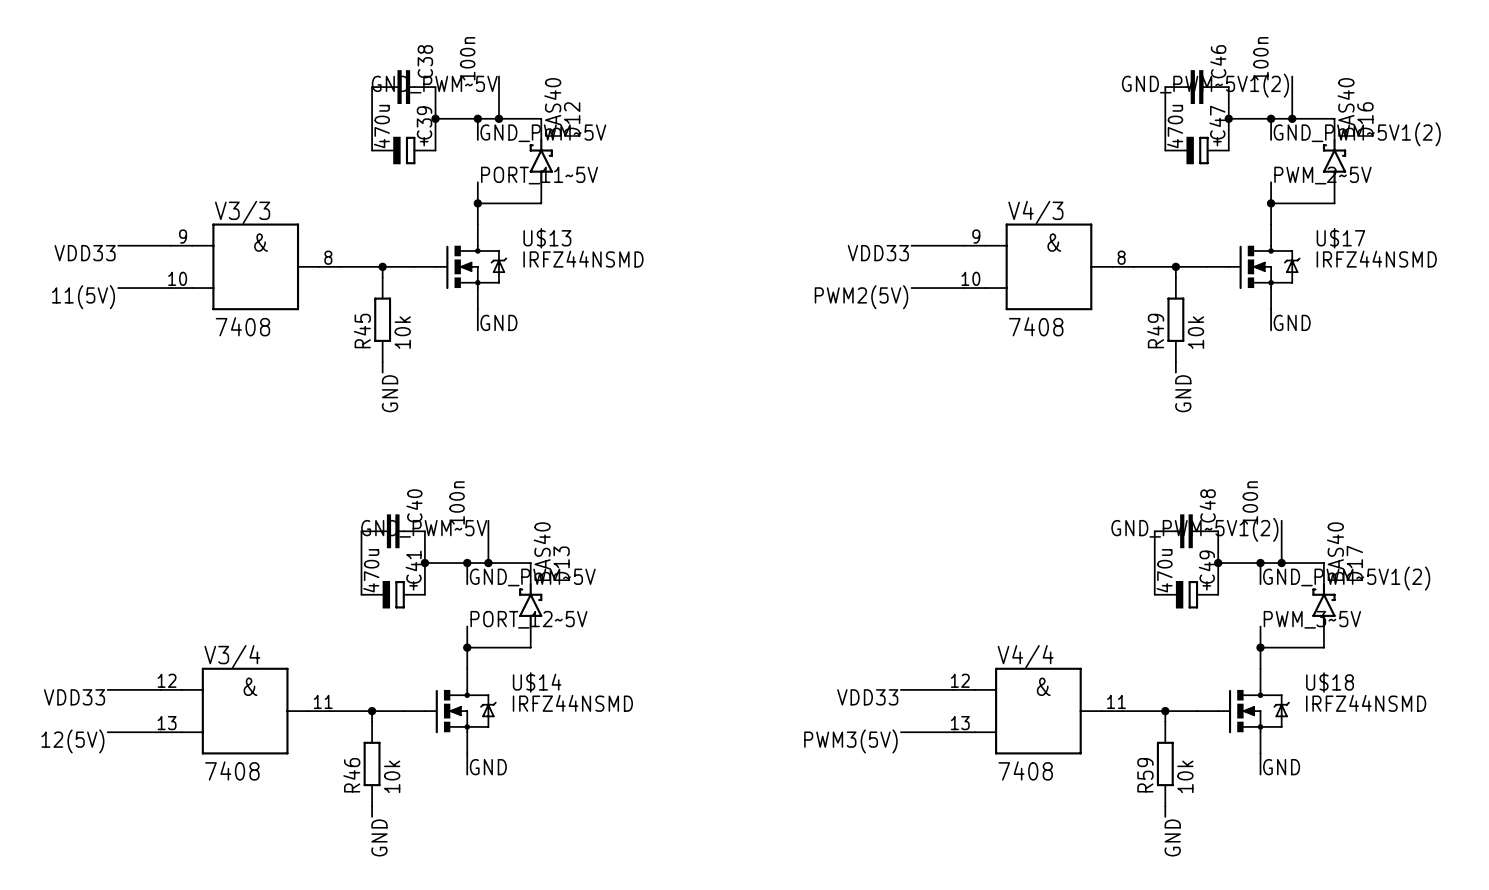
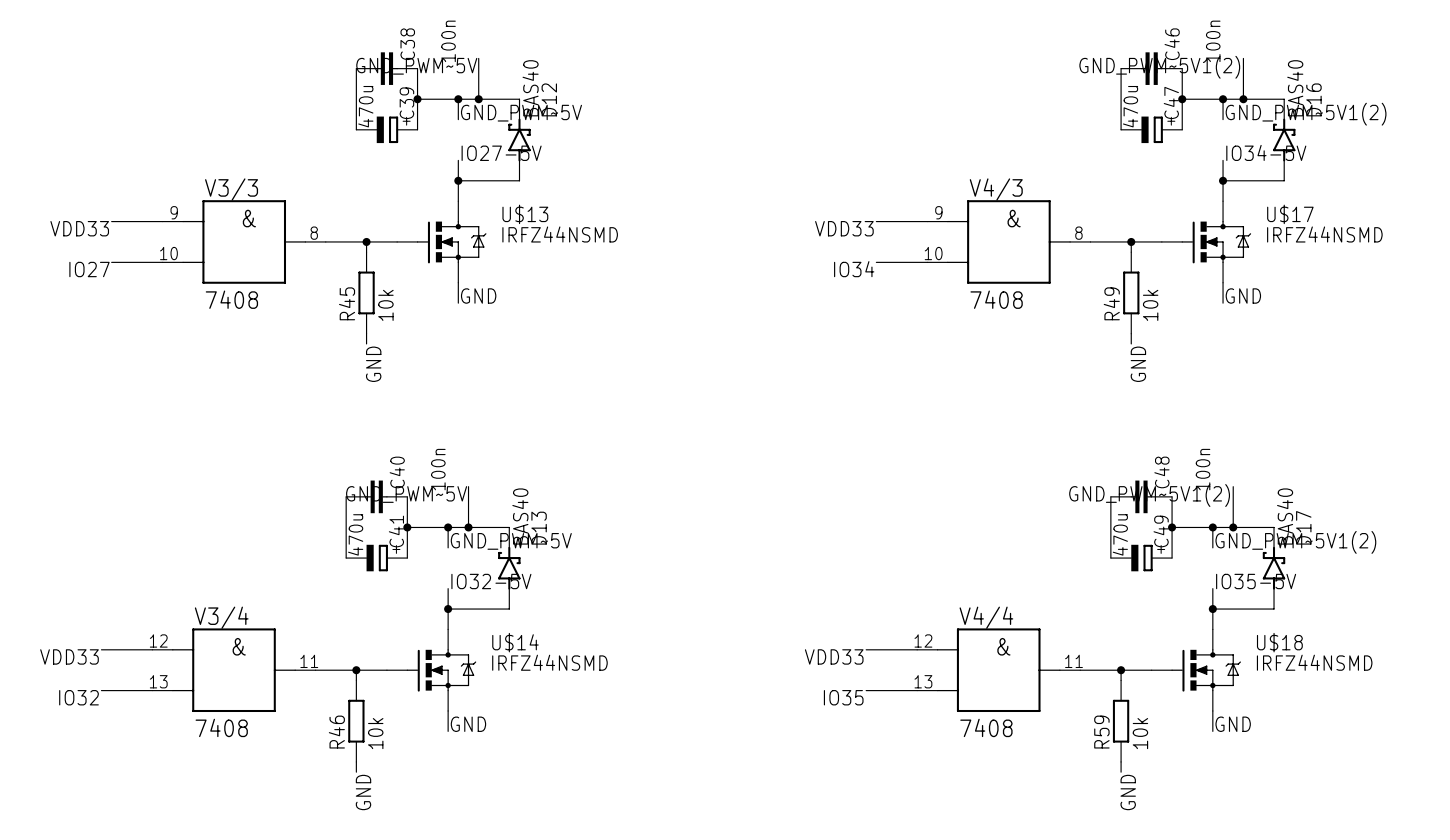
label: PORT_11~5V (539, 175) -> IO27-5V (501, 153)
label: PWM_2~5V (1322, 175) -> IO34-5V (1266, 152)
label: 11(5V) (83, 297) -> IO27 (89, 269)
label: PWM2(5V) (861, 297) -> IO34 (854, 269)
label: PORT_12~5V (528, 619) -> IO32-5V (491, 581)
label: PWM_3~5V (1312, 619) -> IO35-5V (1256, 581)
label: 12(5V) (72, 741) -> IO32 (78, 697)
label: PWM3(5V) (850, 741) -> IO35 (843, 697)

